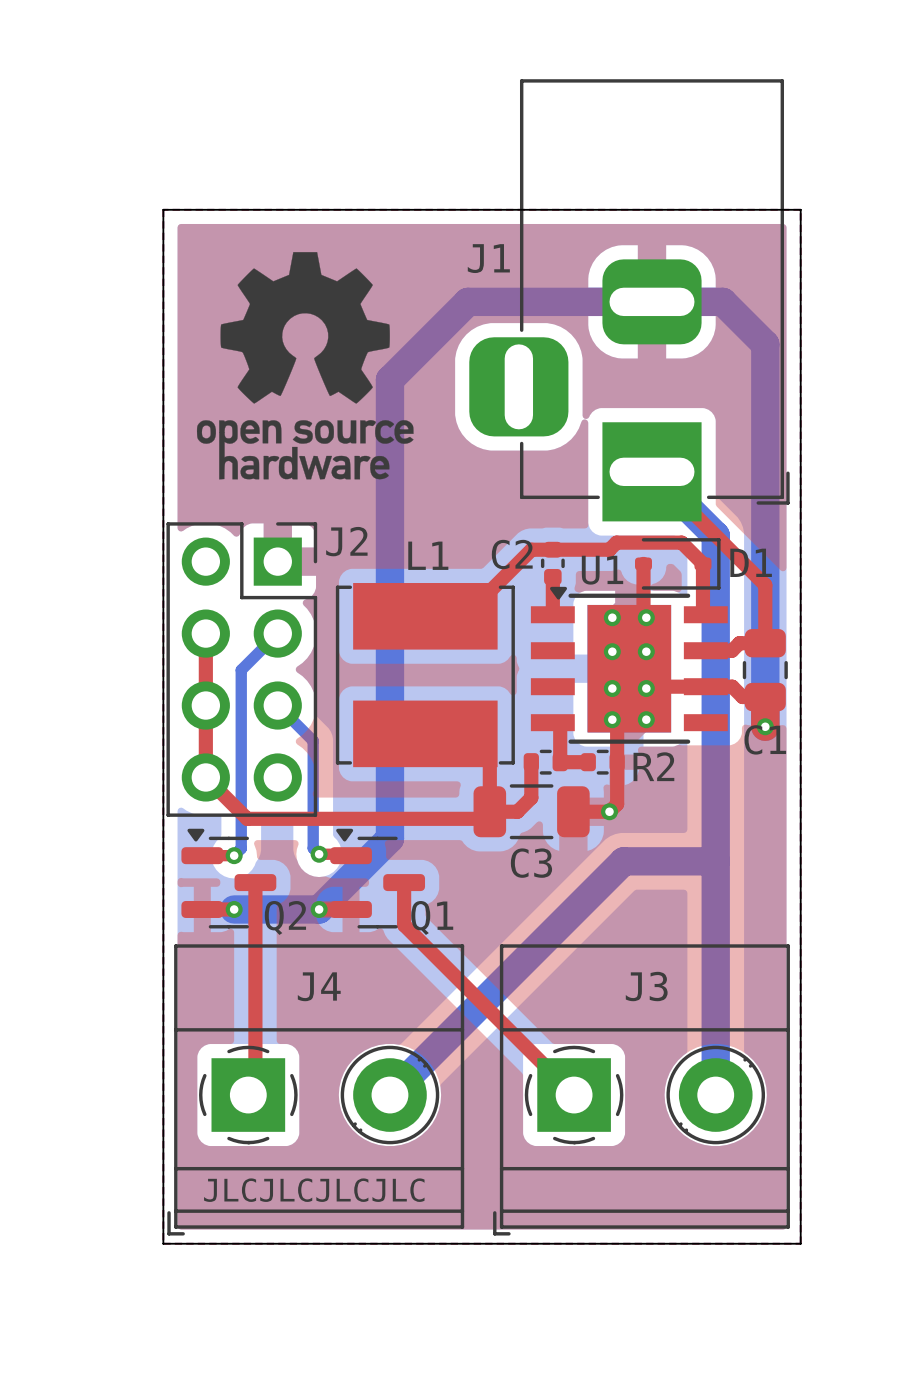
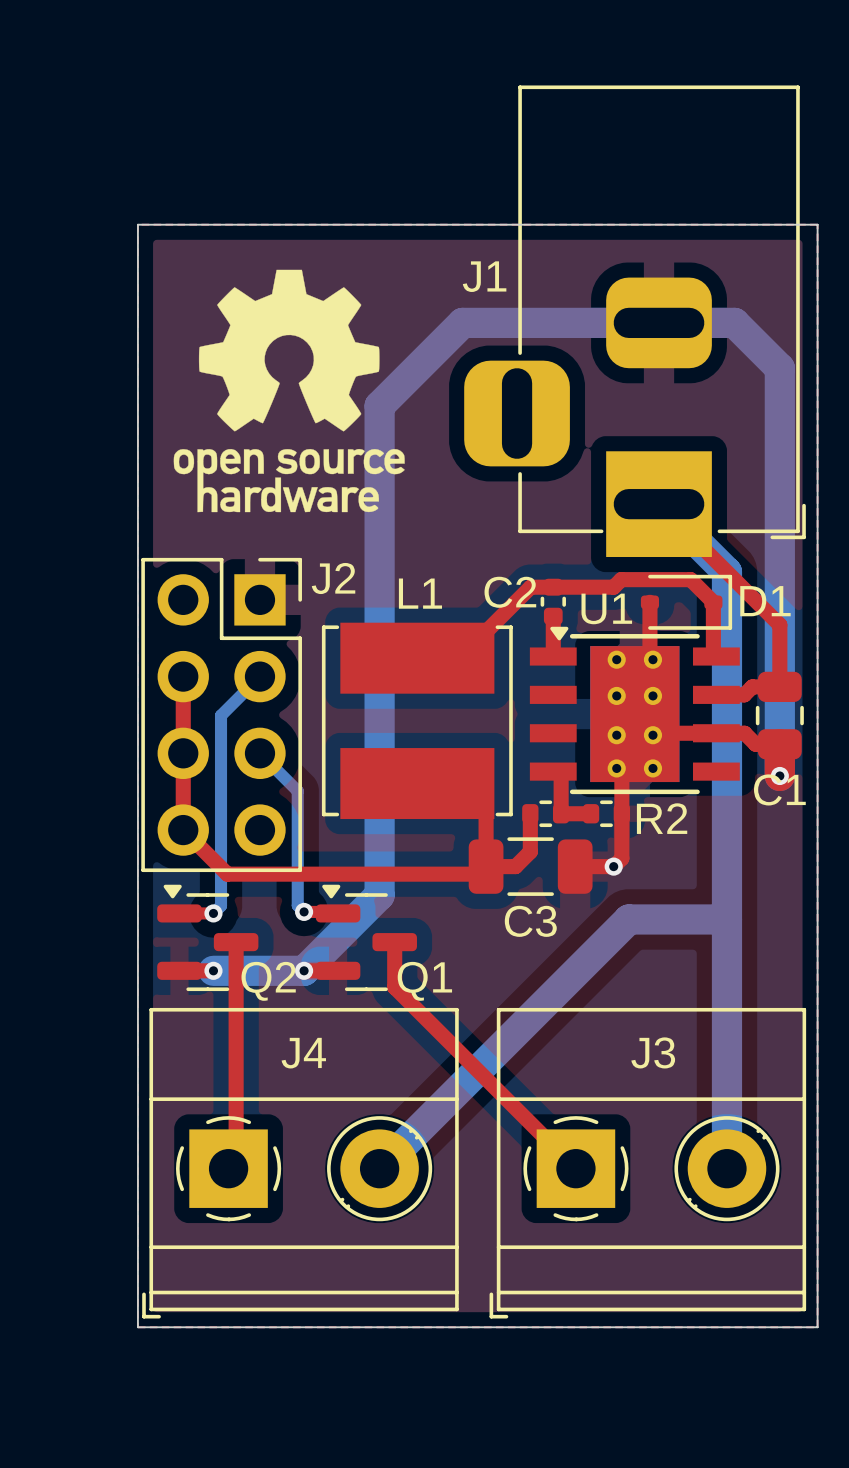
text: JLCJLCJLCJLC (314, 1190) -> none

